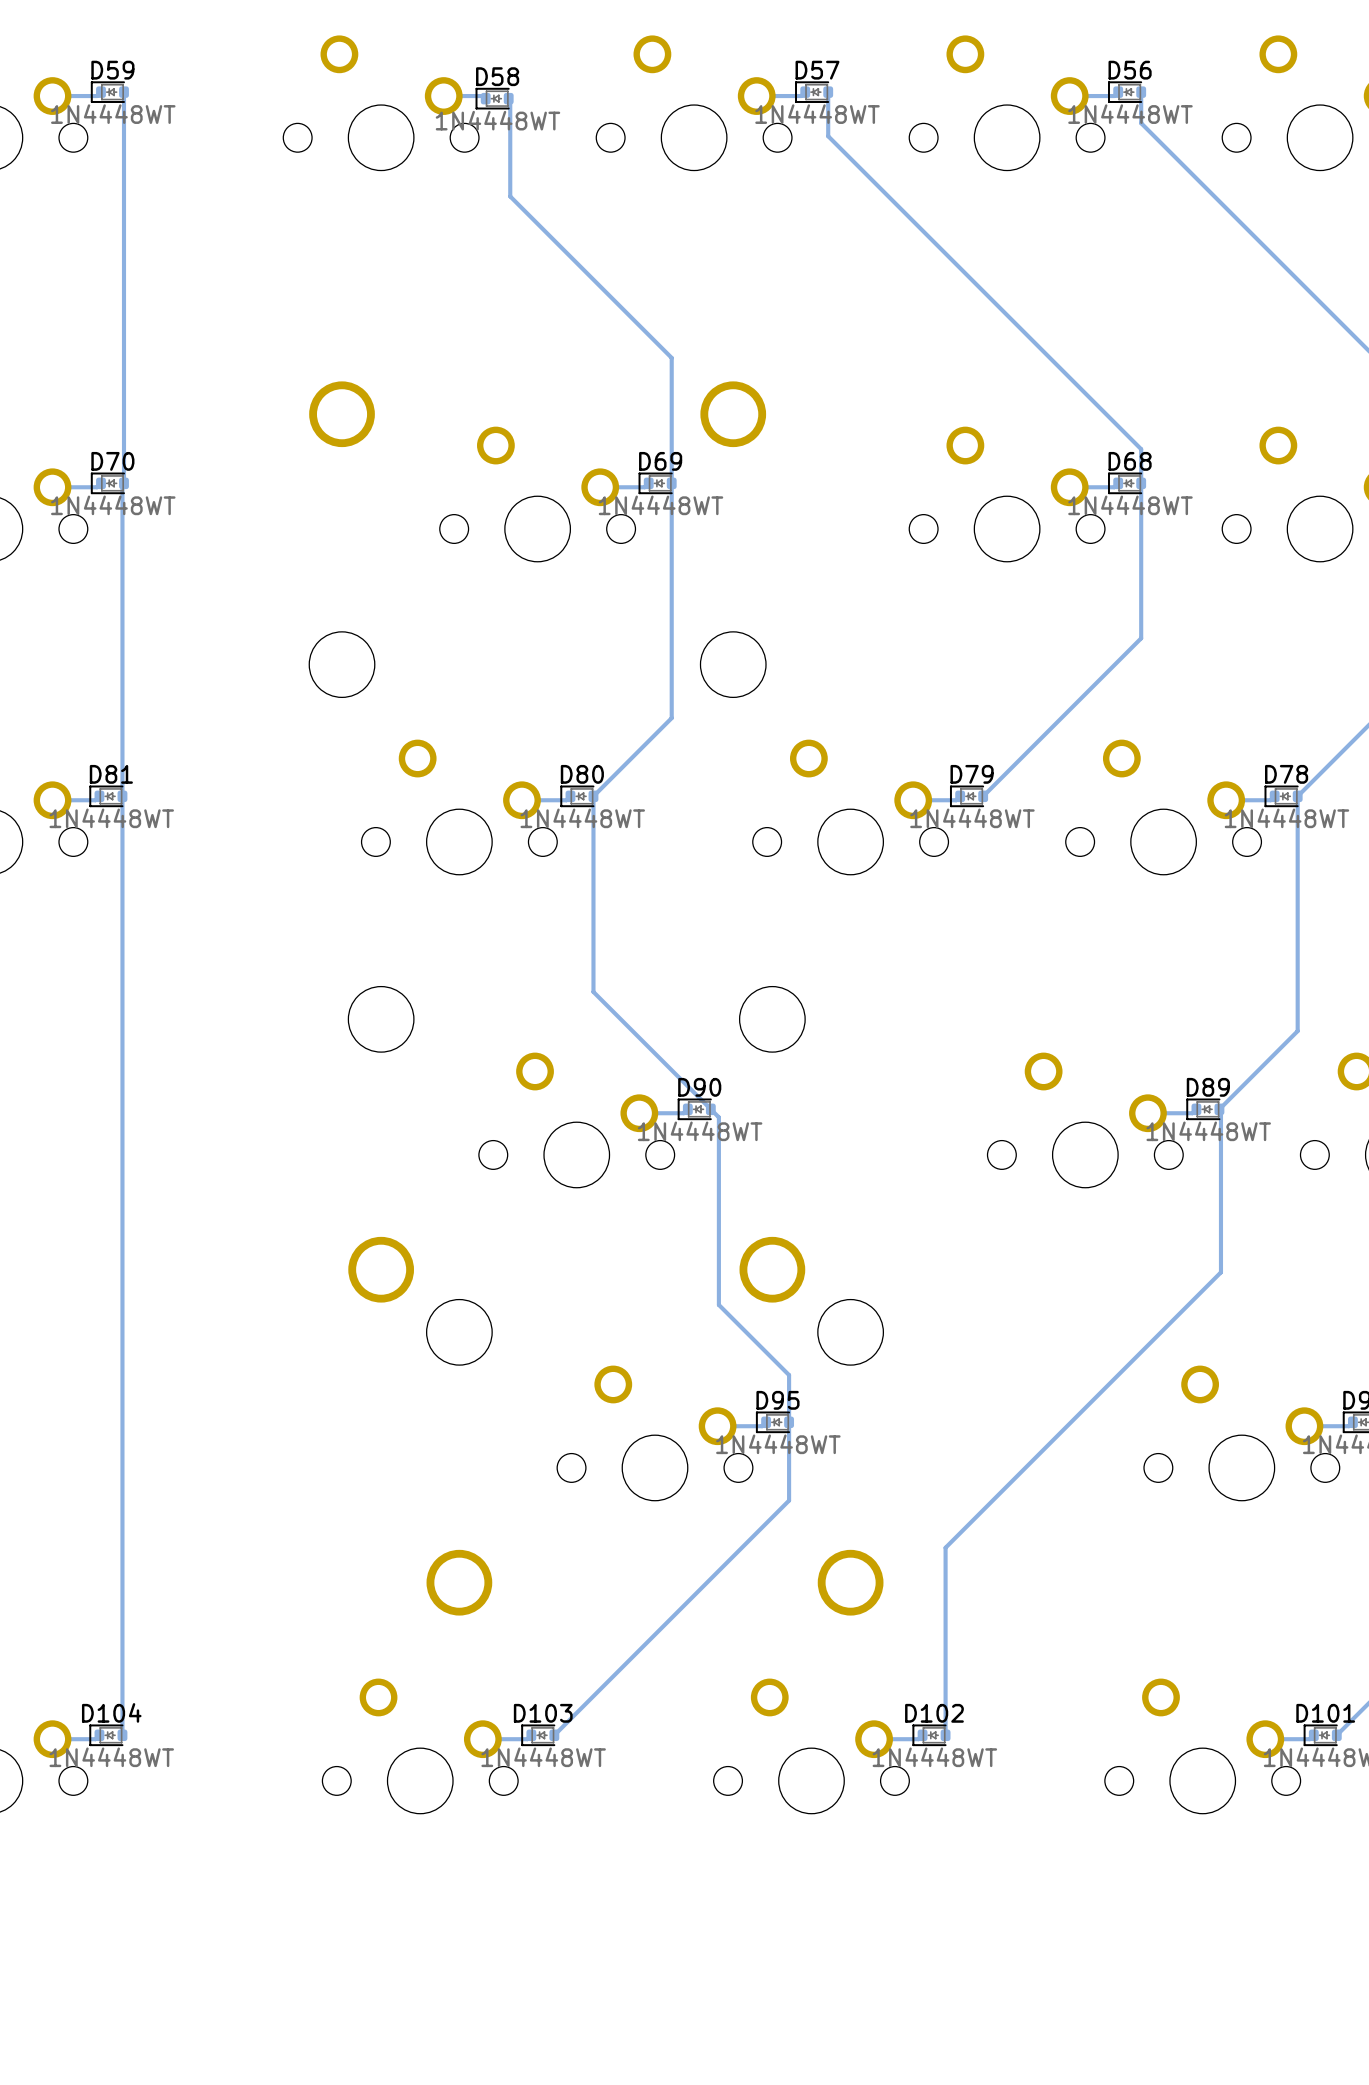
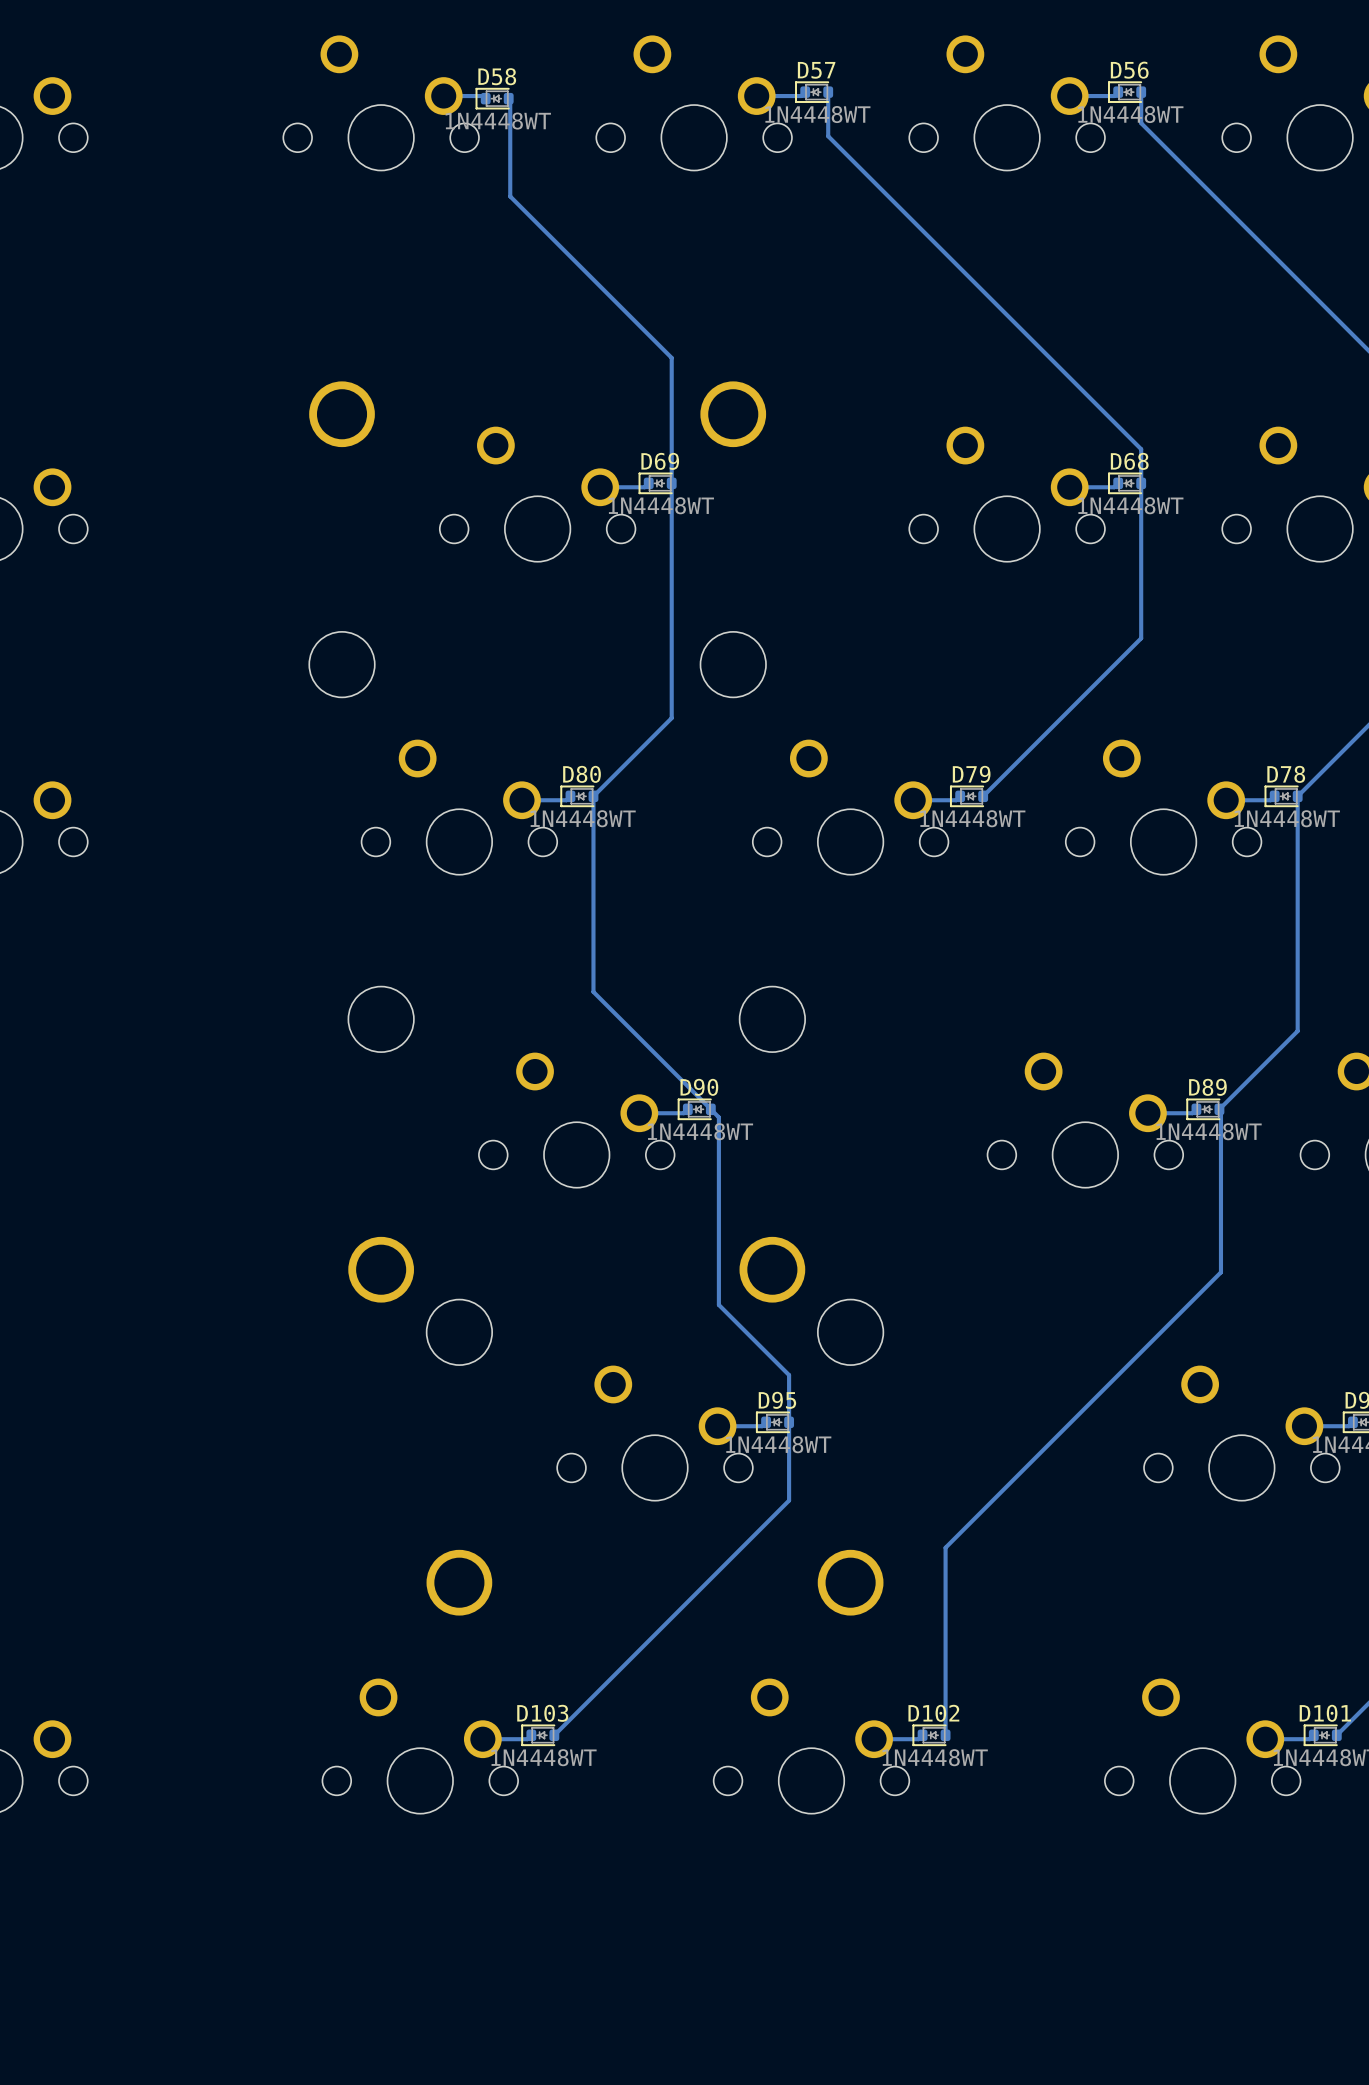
track: (101, 92) (97, 96) (52, 96) -> none
D59: 1N4448WT (109, 92) -> none
track: (124, 92) (122, 1735) -> none
track: (101, 483) (97, 487) (52, 487) -> none
D70: 1N4448WT (109, 483) -> none
track: (99, 796) (95, 800) (52, 800) -> none
D81: 1N4448WT (108, 796) -> none
track: (99, 1735) (95, 1739) (52, 1739) -> none
D104: 1N4448WT (108, 1735) -> none

